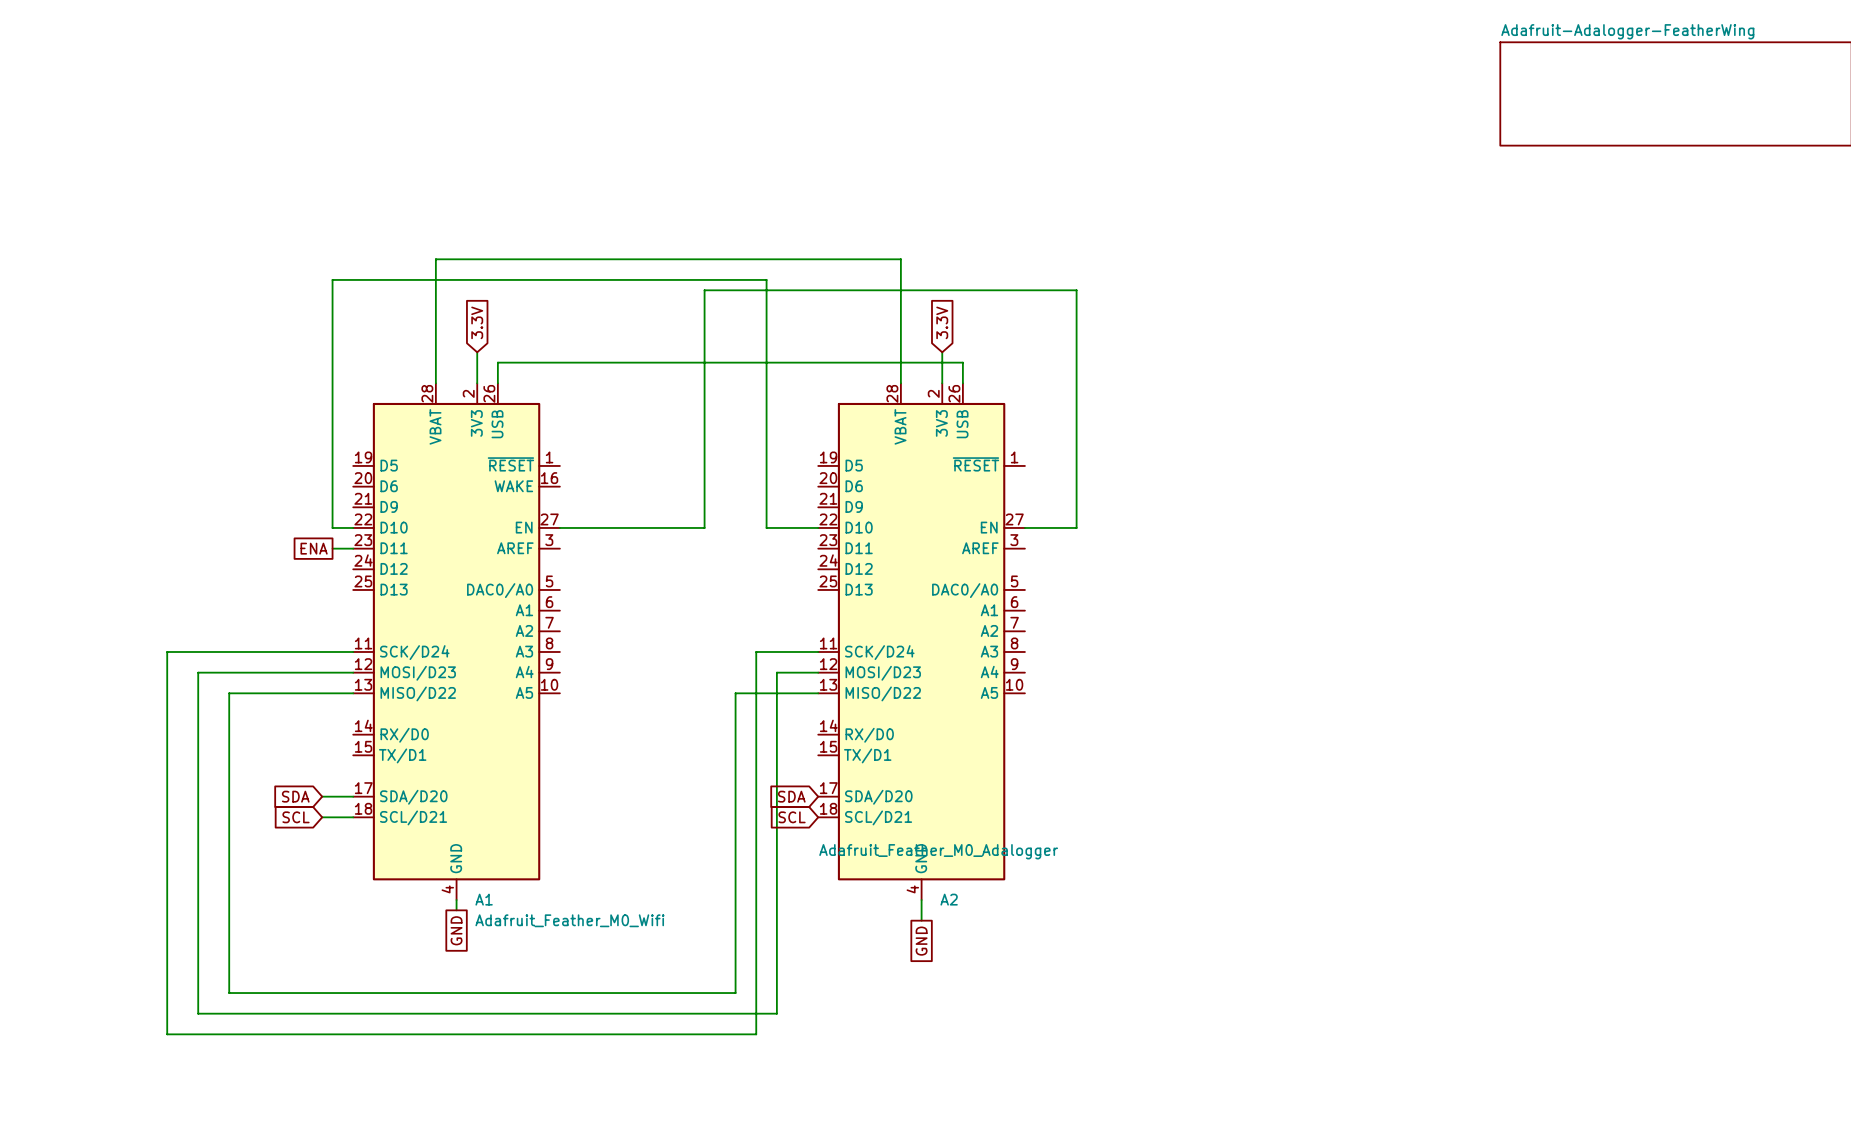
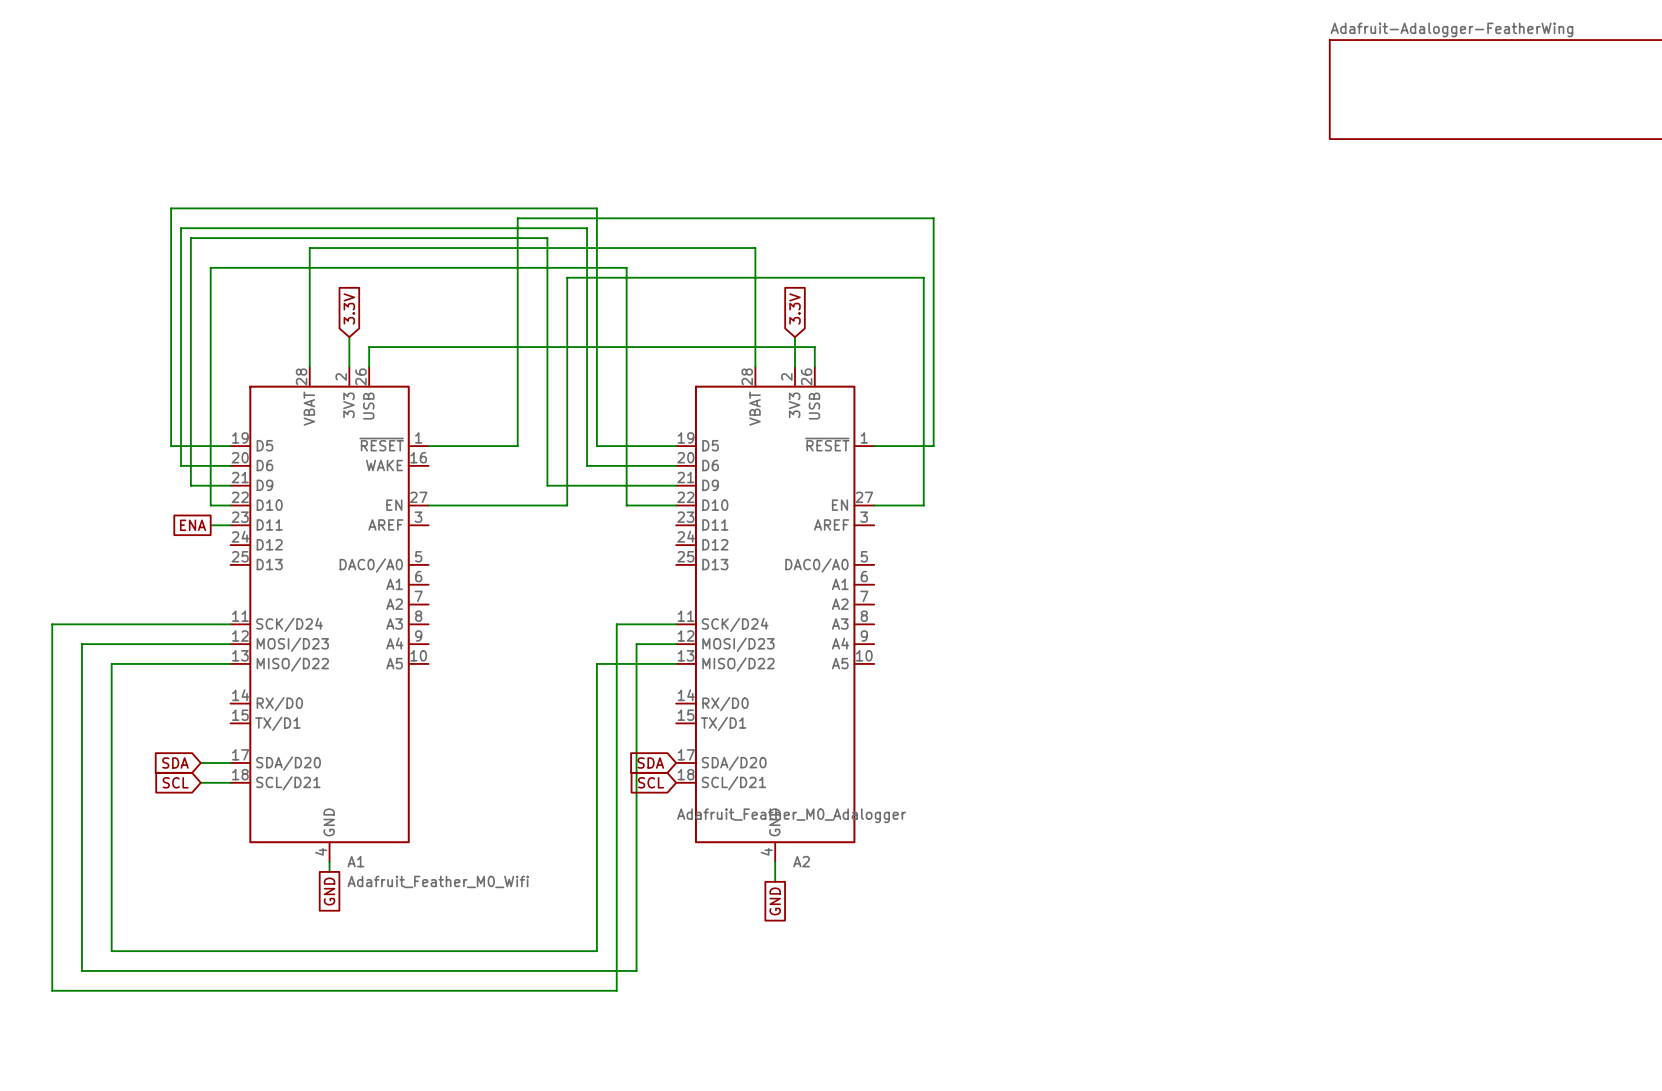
wire: none -> (230, 446) (171, 446) (171, 208) (596, 208) (596, 446) (676, 446)
wire: none -> (428, 446) (517, 446) (517, 218) (933, 218) (933, 446) (874, 446)
wire: none -> (230, 465) (180, 465) (180, 228) (587, 228) (587, 465) (676, 465)
wire: none -> (230, 485) (190, 485) (190, 238) (547, 238) (547, 485) (676, 485)

